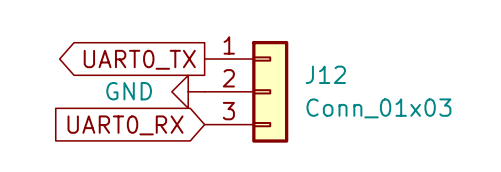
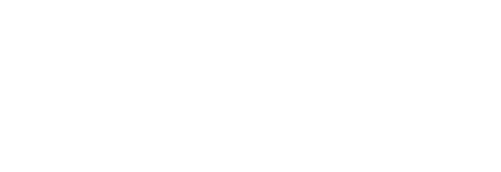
global label: UART0_TX (139, 59) -> none
power symbol: GND (188, 91) -> none
J12: Conn_01x03 (246, 91) -> none
global label: UART0_RX (125, 125) -> none

